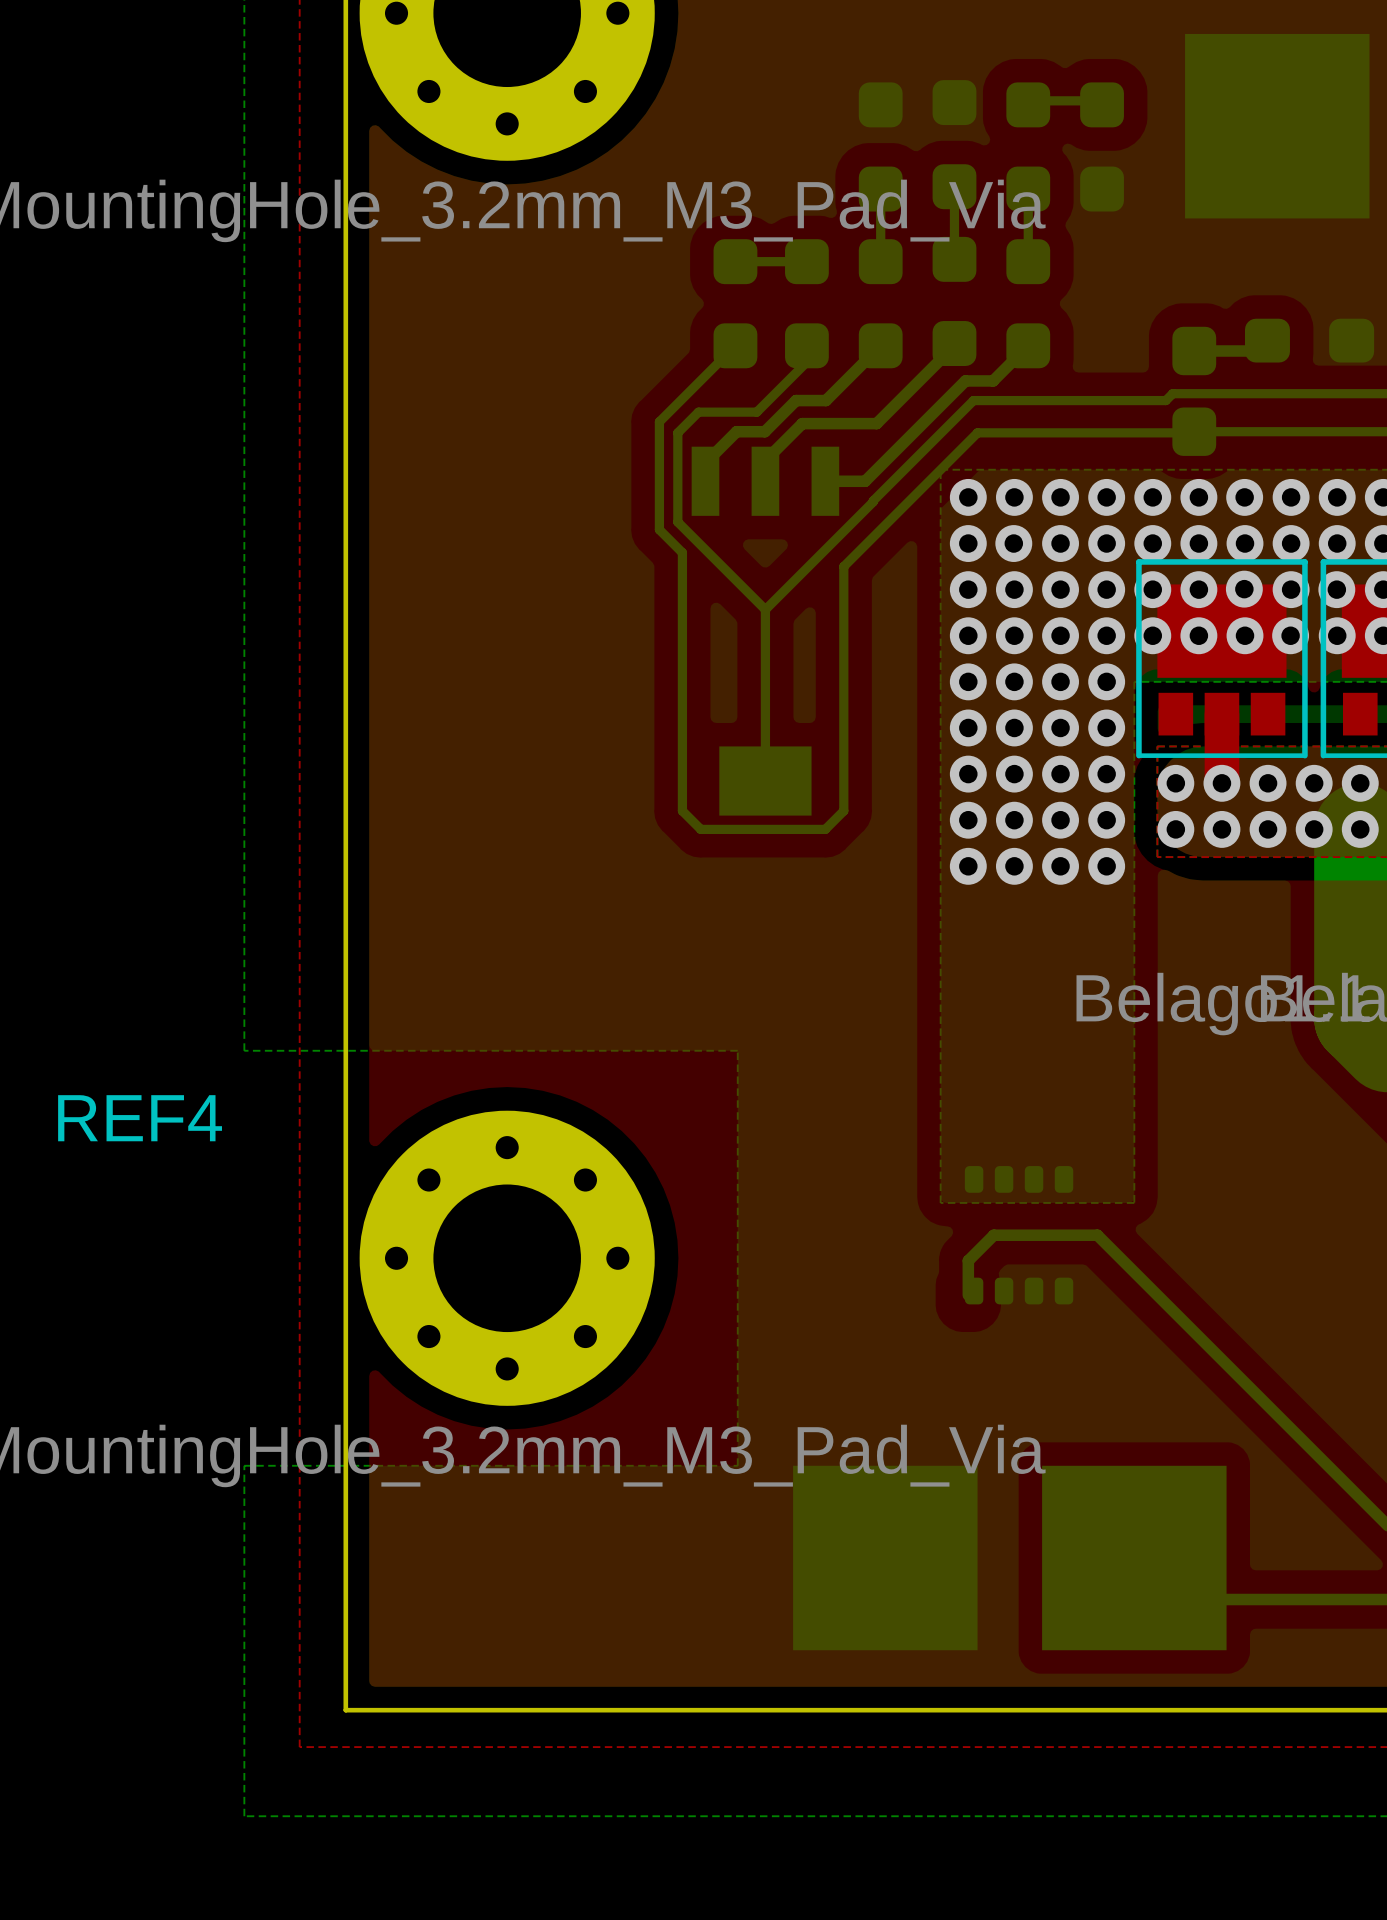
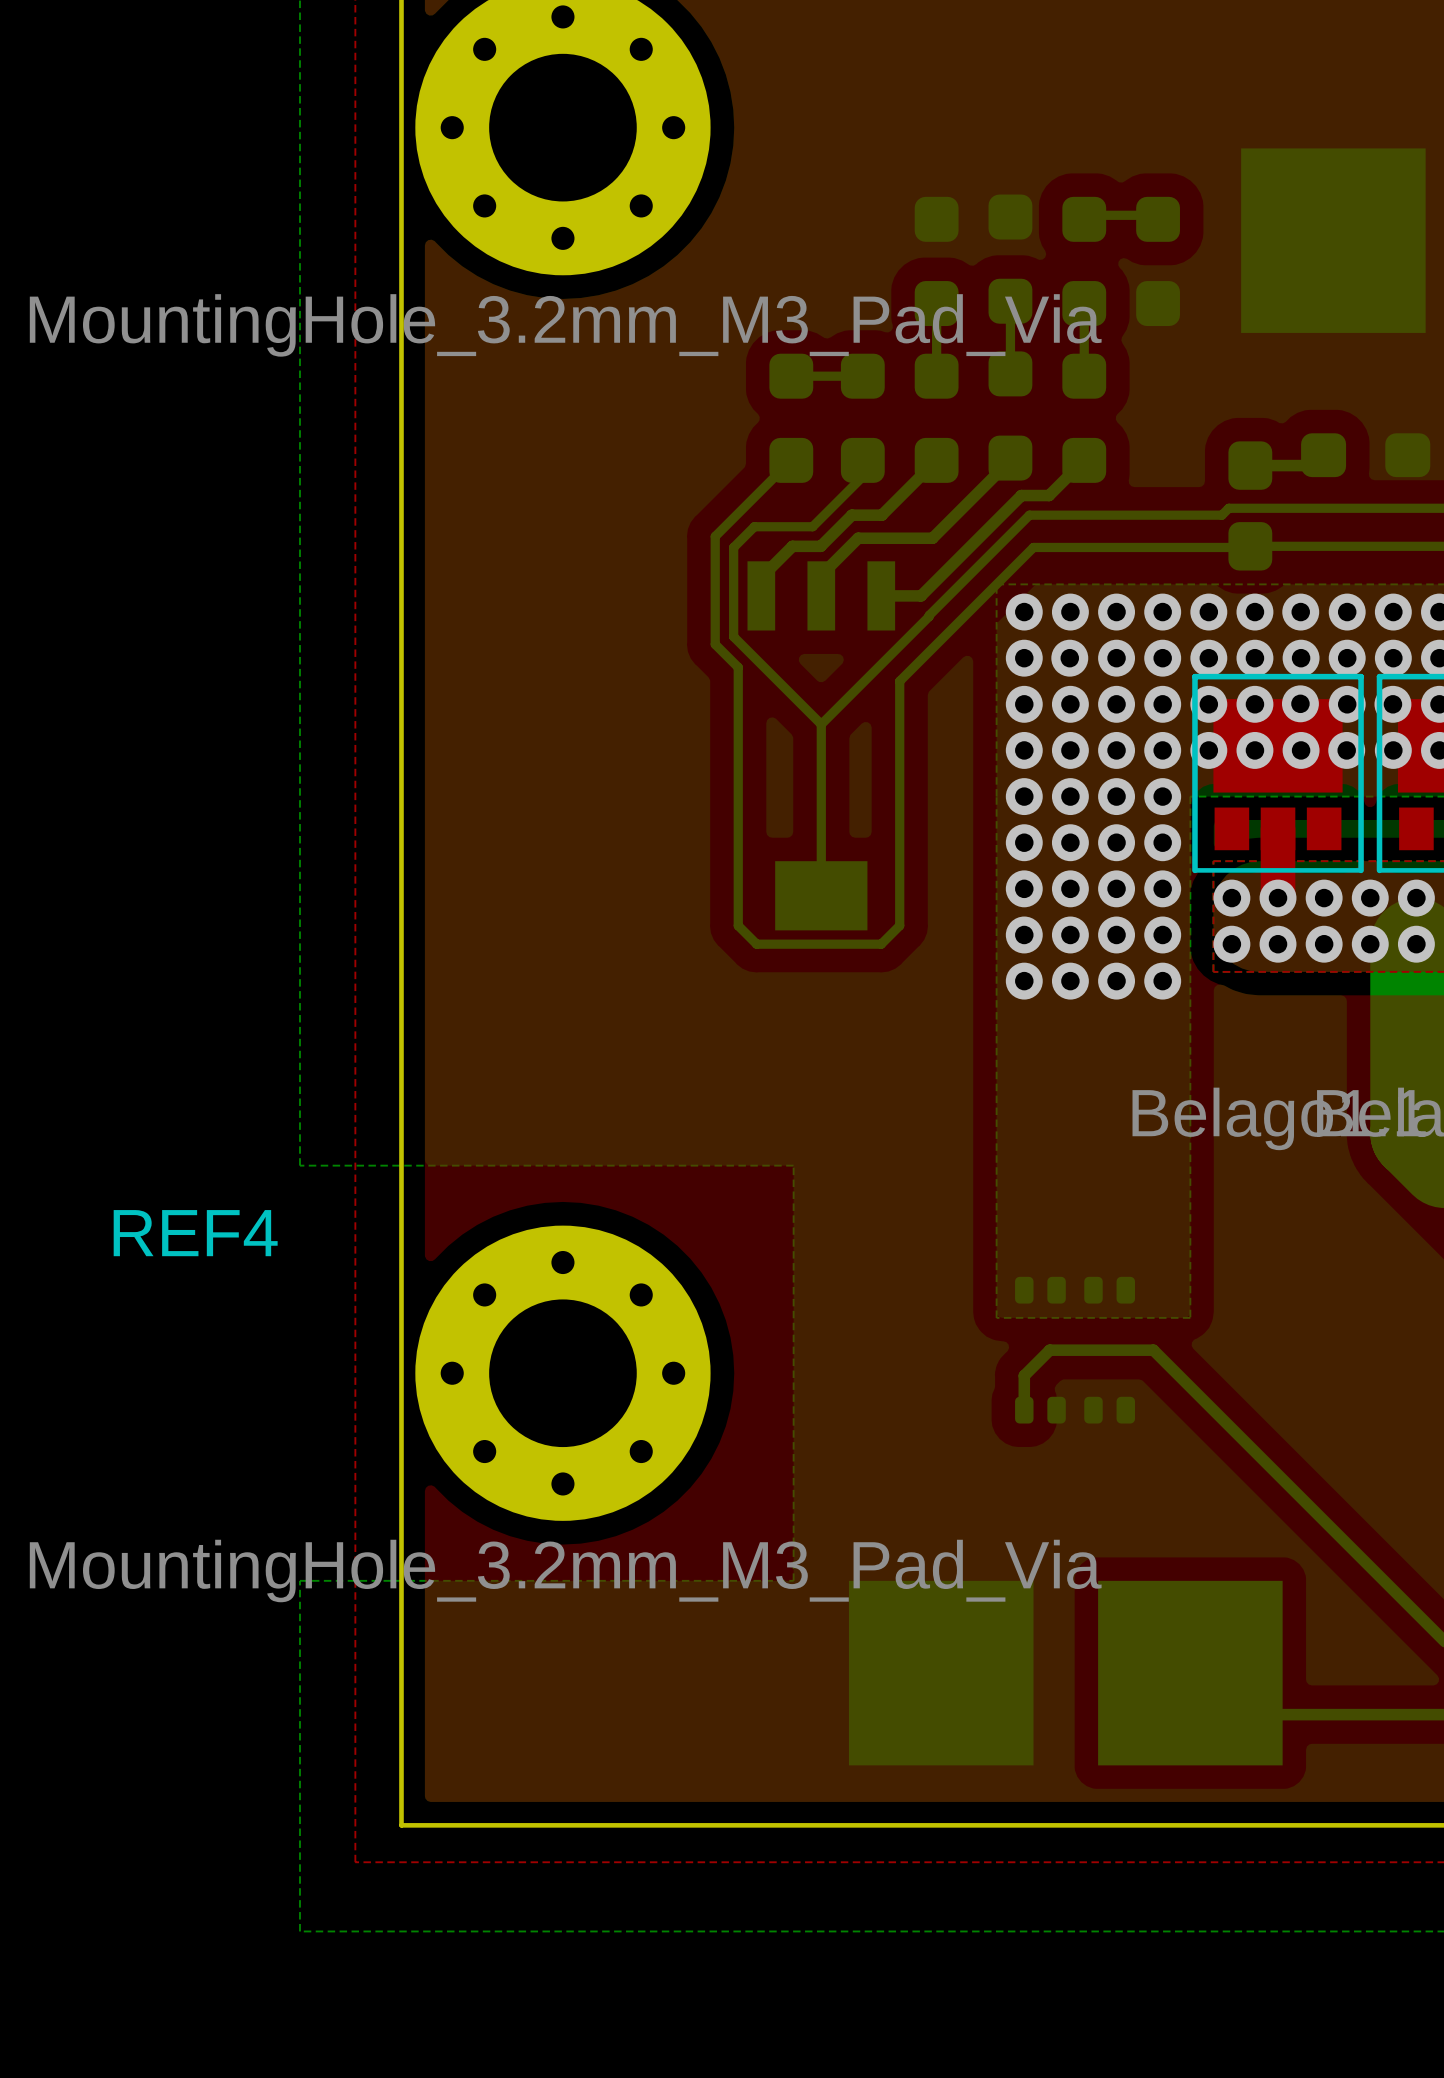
part footprint: [964, 1166, 1074, 1305] -> [1015, 1276, 1136, 1424]

